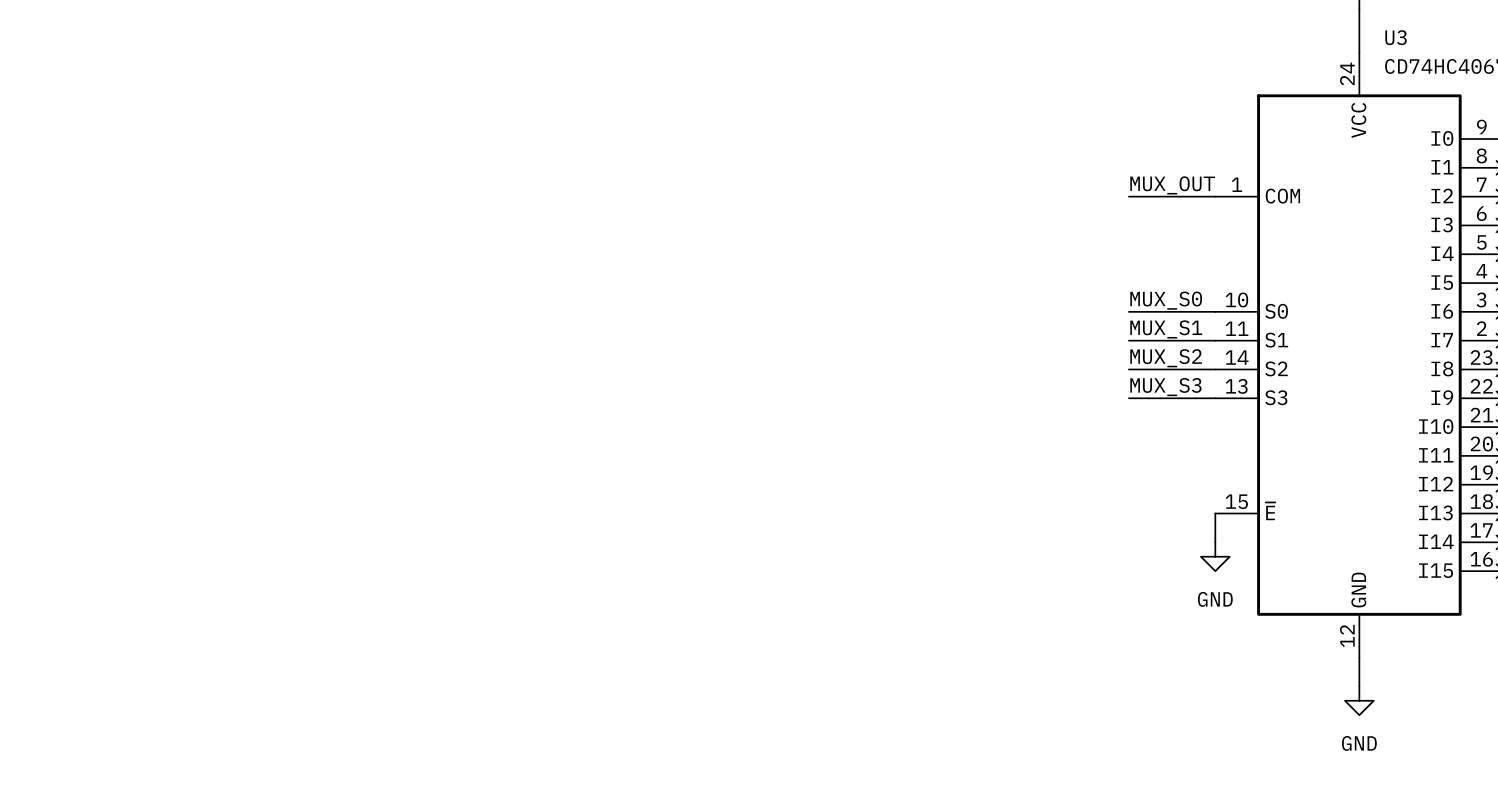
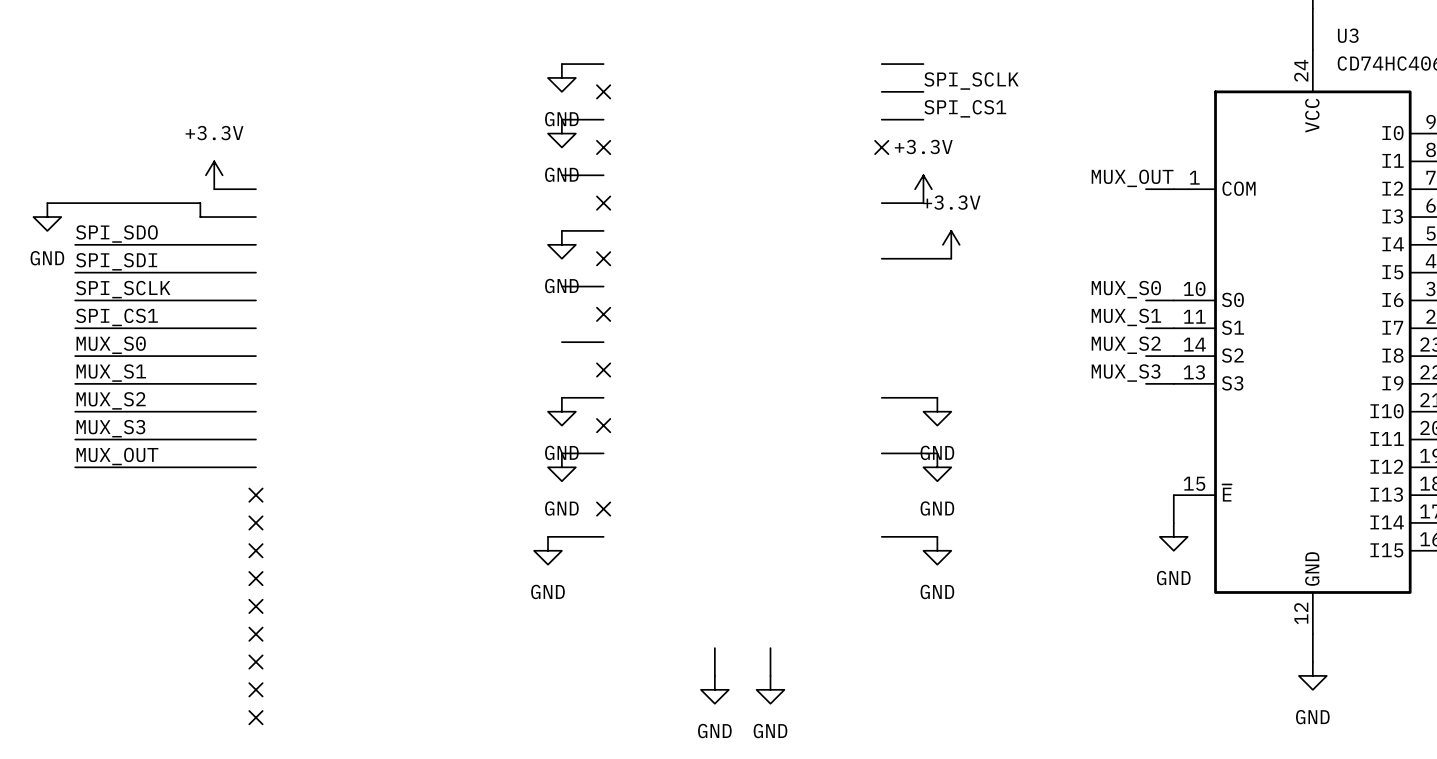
wire: none -> (561, 64) (603, 64)
wire: none -> (881, 64) (923, 64)
power symbol: none -> GND (561, 77)
label: none -> SPI_SCLK (971, 81)
no-connect mark: none -> (603, 91)
wire: none -> (881, 91) (923, 91)
label: none -> SPI_CS1 (965, 108)
wire: none -> (561, 119) (603, 119)
wire: none -> (881, 119) (923, 119)
power symbol: none -> GND (561, 133)
no-connect mark: none -> (603, 147)
no-connect mark: none -> (881, 147)
power symbol: none -> +3.3V (214, 175)
wire: none -> (561, 175) (603, 175)
wire: none -> (214, 189) (255, 189)
power symbol: none -> +3.3V (923, 189)
wire: (1128, 196) (1186, 196) -> none
wire: none -> (47, 203) (200, 203) (200, 217) (255, 217)
no-connect mark: none -> (603, 203)
wire: none -> (881, 203) (923, 203)
power symbol: none -> GND (47, 217)
wire: none -> (561, 230) (603, 230)
label: none -> SPI_SDO (116, 233)
wire: none -> (75, 244) (255, 244)
power symbol: none -> GND (561, 244)
power symbol: none -> +3.3V (951, 244)
no-connect mark: none -> (603, 258)
wire: none -> (881, 258) (951, 258)
label: none -> SPI_SDI (116, 261)
wire: none -> (75, 272) (255, 272)
wire: none -> (561, 286) (603, 286)
label: none -> SPI_SCLK (123, 289)
wire: none -> (75, 300) (255, 300)
wire: (1128, 311) (1186, 311) -> none
no-connect mark: none -> (603, 314)
label: none -> SPI_CS1 (117, 317)
wire: none -> (75, 328) (255, 328)
wire: (1128, 340) (1186, 340) -> (881, 397) (937, 397)
wire: none -> (561, 342) (603, 342)
label: none -> MUX_S0 (111, 345)
wire: none -> (75, 356) (255, 356)
wire: (1128, 369) (1186, 369) -> none
no-connect mark: none -> (603, 369)
label: none -> MUX_S1 (111, 373)
wire: none -> (75, 383) (255, 383)
wire: (1128, 398) (1186, 398) -> (881, 453) (937, 453)
wire: none -> (561, 397) (603, 397)
label: none -> MUX_S2 (111, 400)
wire: none -> (75, 411) (255, 411)
power symbol: none -> GND (561, 411)
power symbol: none -> GND (937, 411)
no-connect mark: none -> (603, 425)
label: none -> MUX_S3 (110, 428)
wire: none -> (75, 439) (255, 439)
wire: none -> (561, 453) (603, 453)
label: none -> MUX_OUT (117, 456)
wire: none -> (75, 467) (255, 467)
power symbol: none -> GND (561, 467)
power symbol: none -> GND (937, 467)
no-connect mark: none -> (255, 495)
no-connect mark: none -> (603, 509)
no-connect mark: none -> (255, 522)
wire: none -> (548, 536) (603, 536)
wire: none -> (881, 536) (937, 536)
no-connect mark: none -> (255, 550)
power symbol: none -> GND (548, 550)
power symbol: none -> GND (937, 550)
no-connect mark: none -> (255, 578)
no-connect mark: none -> (255, 606)
no-connect mark: none -> (255, 634)
wire: none -> (714, 648) (714, 675)
wire: none -> (770, 648) (770, 675)
no-connect mark: none -> (255, 662)
no-connect mark: none -> (255, 689)
power symbol: none -> GND (714, 689)
power symbol: none -> GND (770, 689)
no-connect mark: none -> (255, 717)

